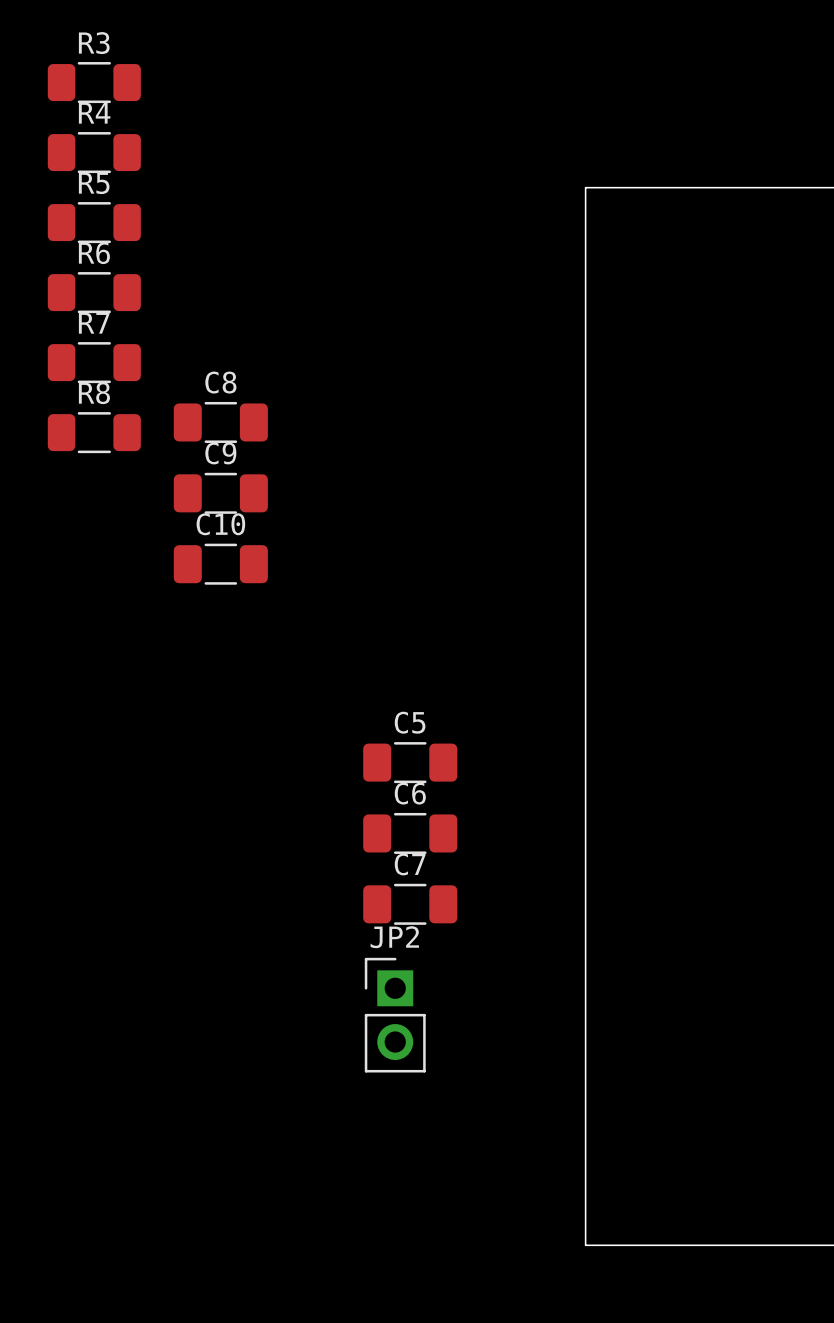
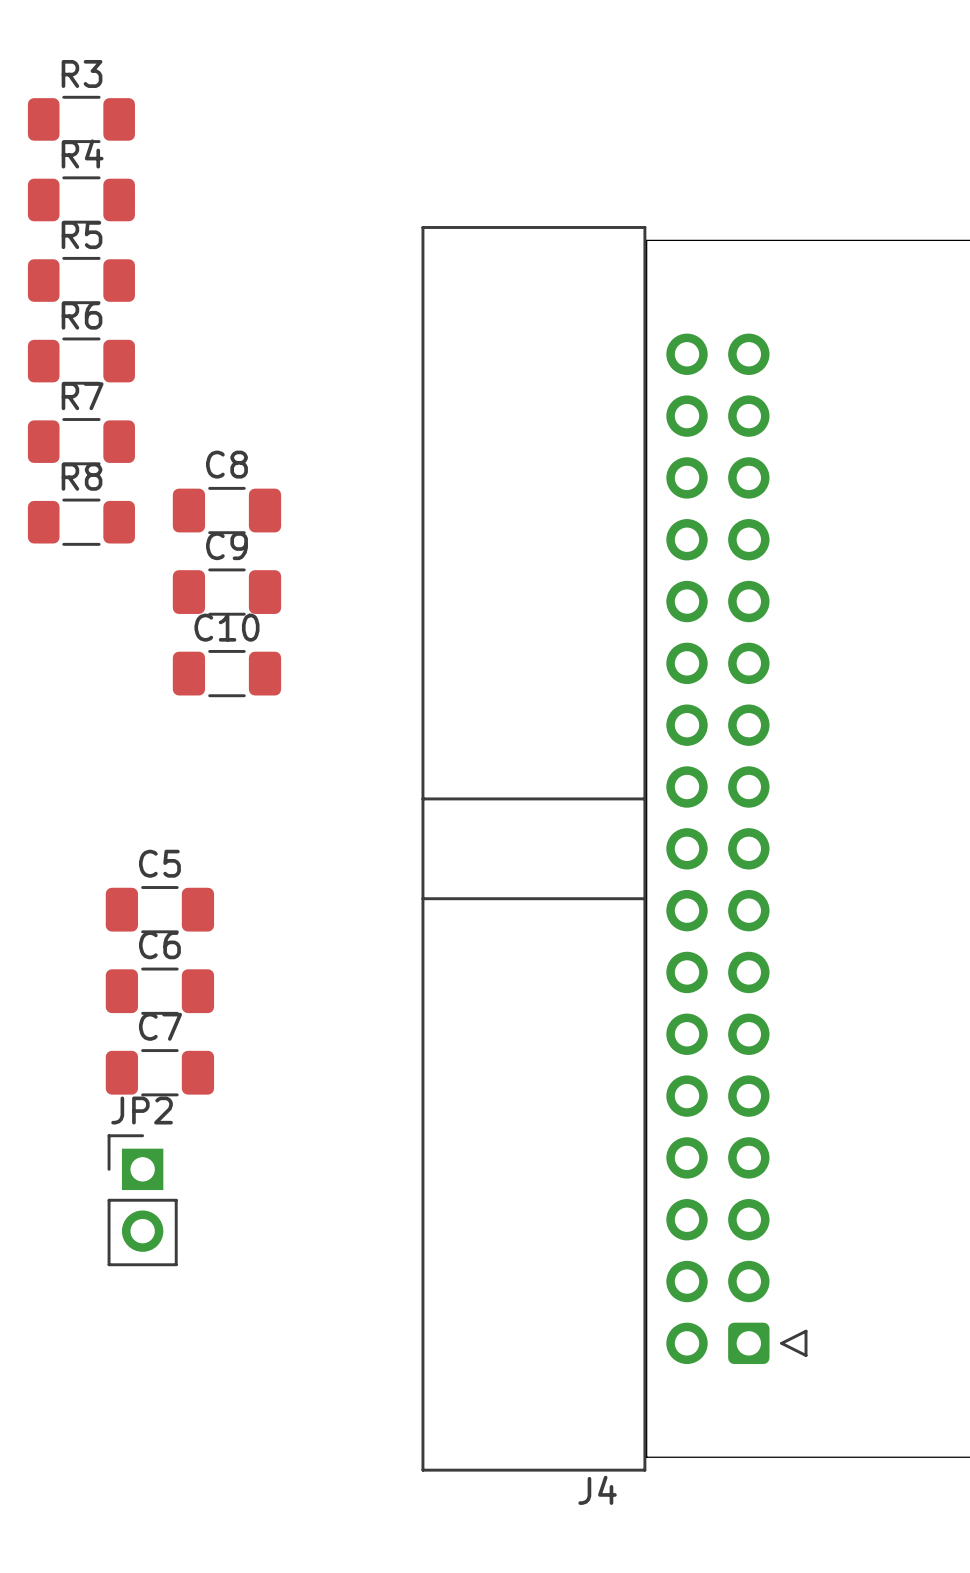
J4: none -> (614, 848)
C5 position: (410, 762) -> (159, 909)
C6 position: (410, 833) -> (159, 991)
C7 position: (410, 904) -> (159, 1072)
JP2 position: (395, 1015) -> (142, 1200)

